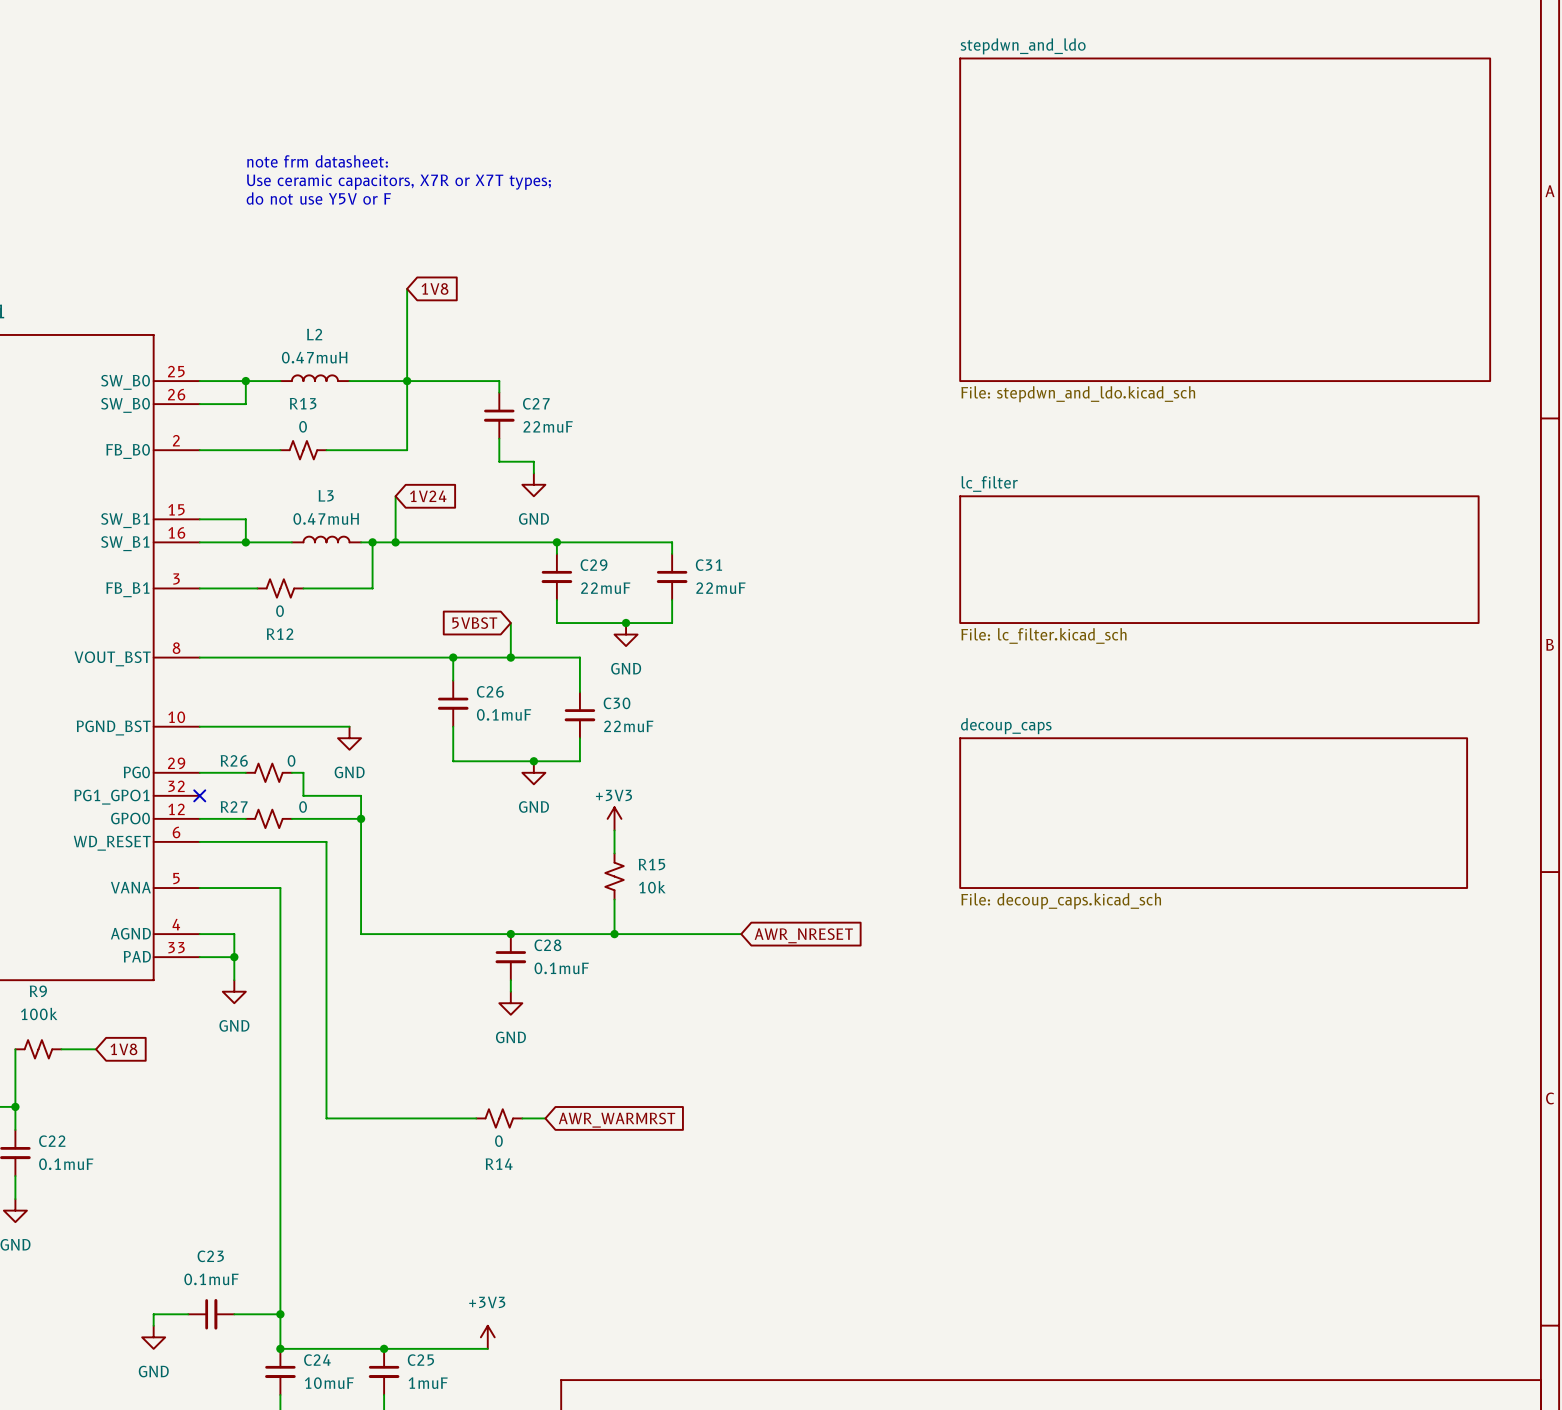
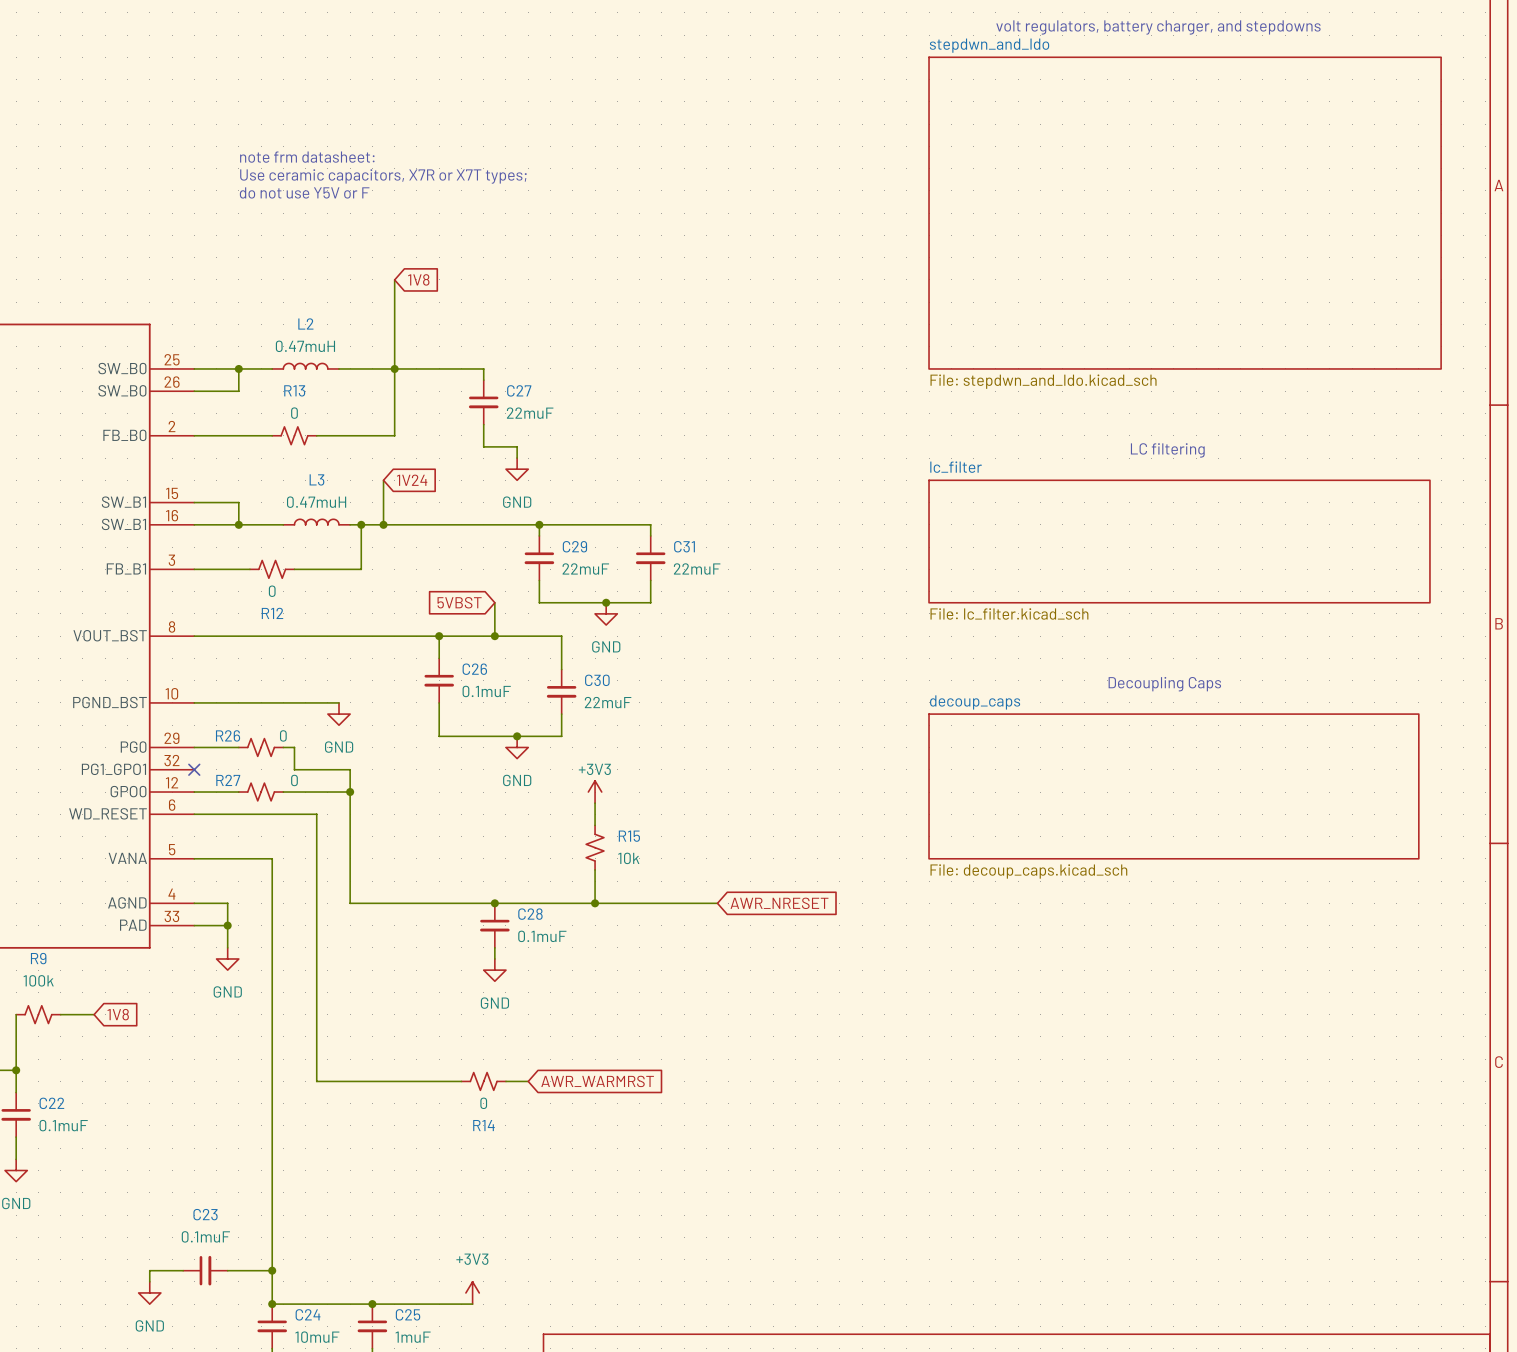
text: none -> volt regulators, battery charger, and stepdowns (1158, 27)
text: none -> LC filtering (1167, 450)
text: none -> Decoupling Caps (1164, 684)

